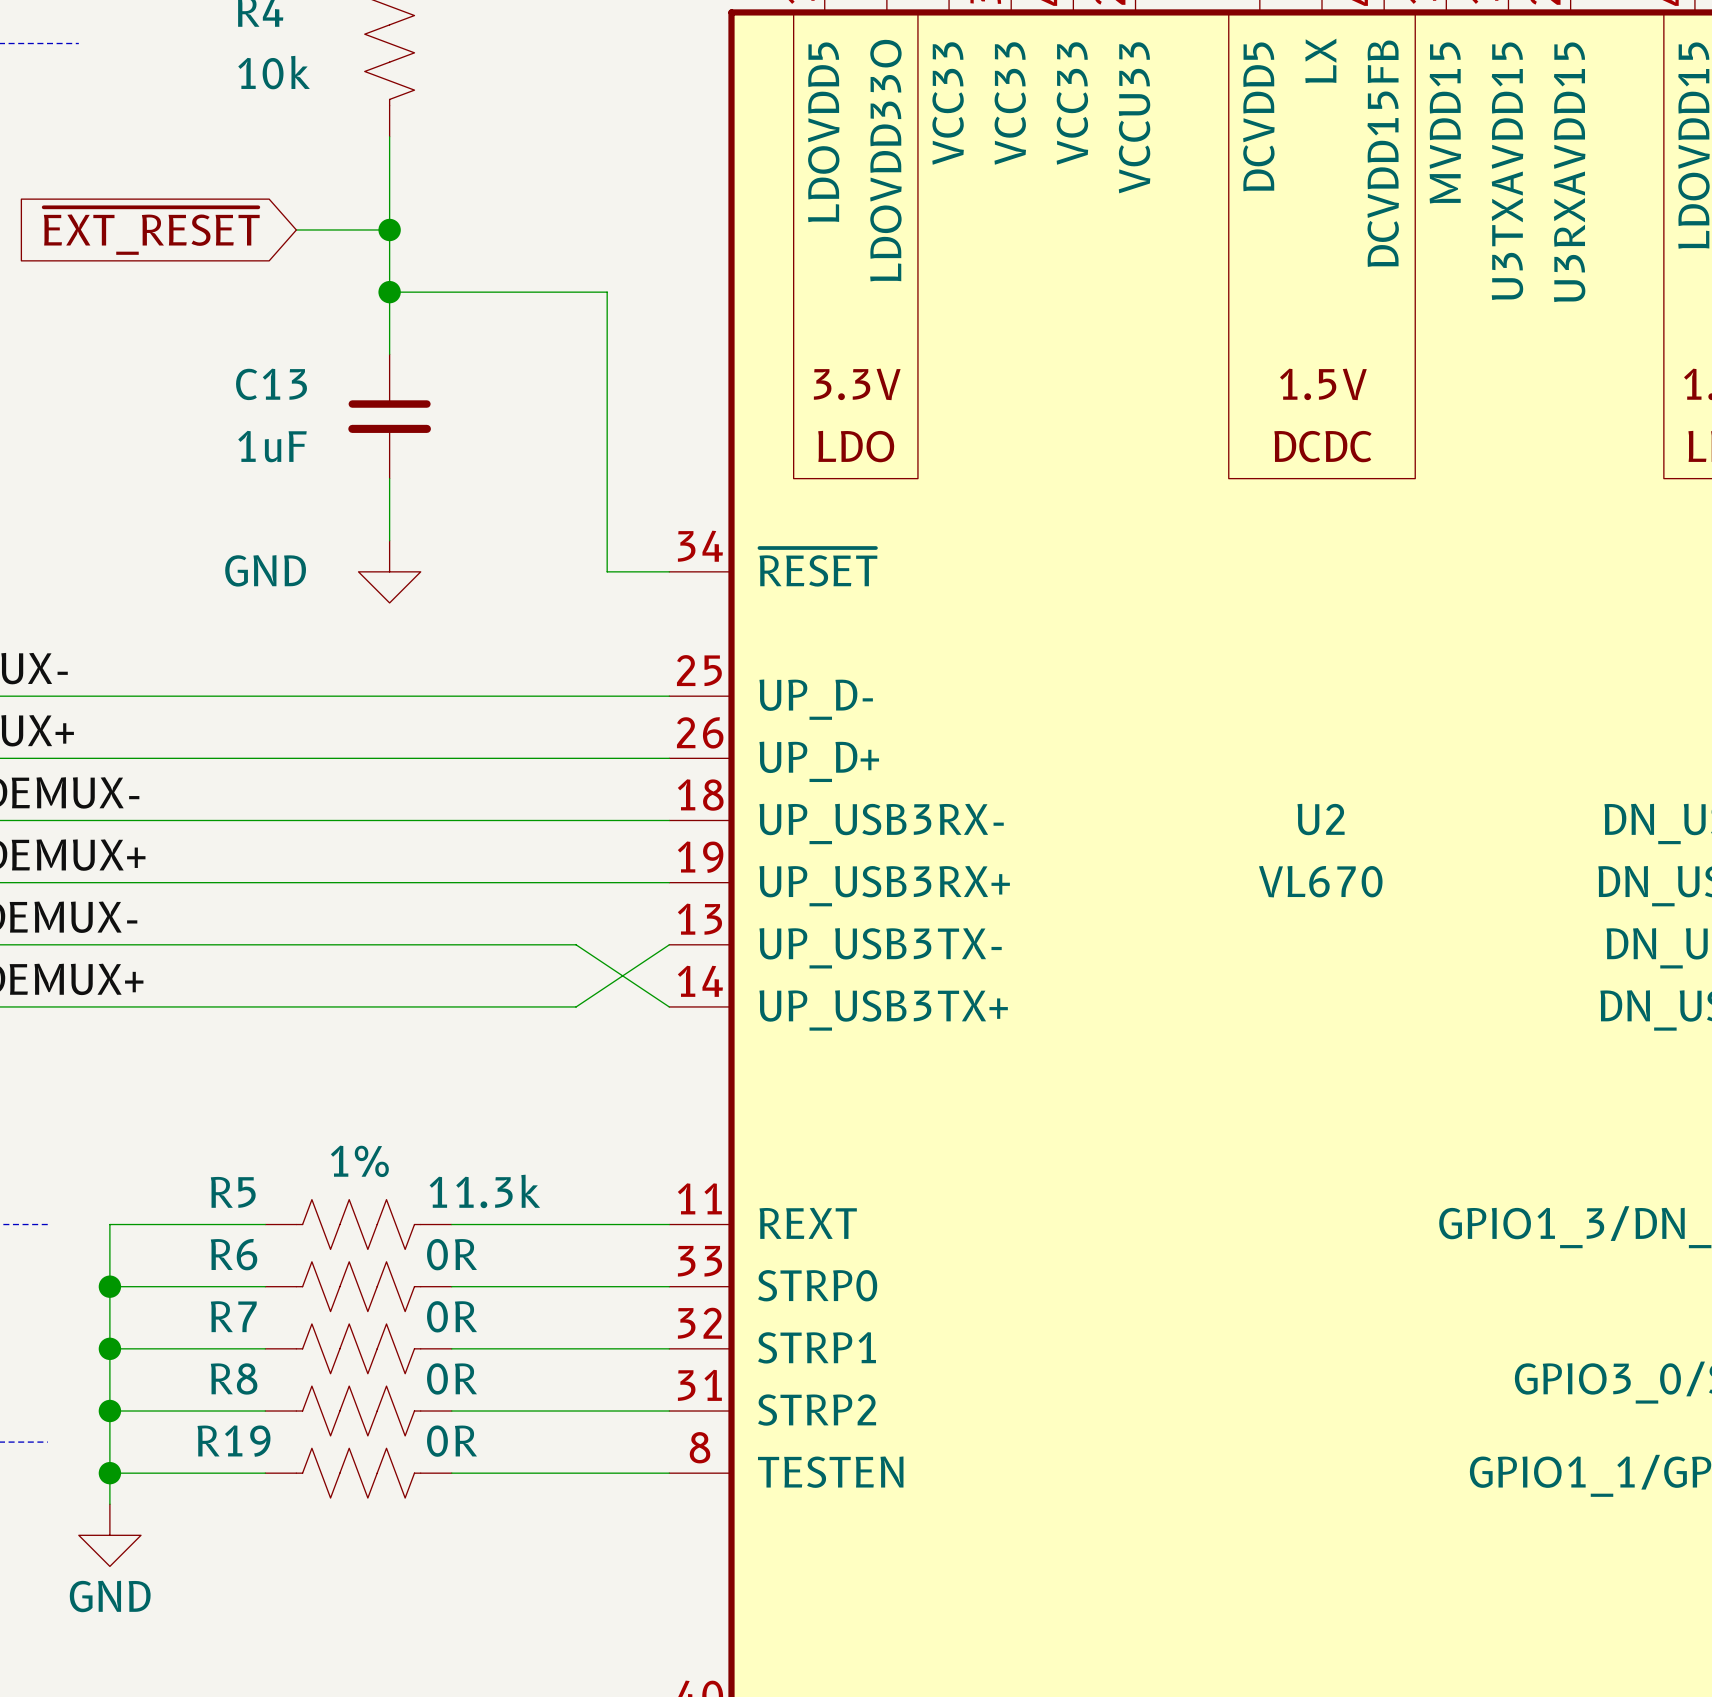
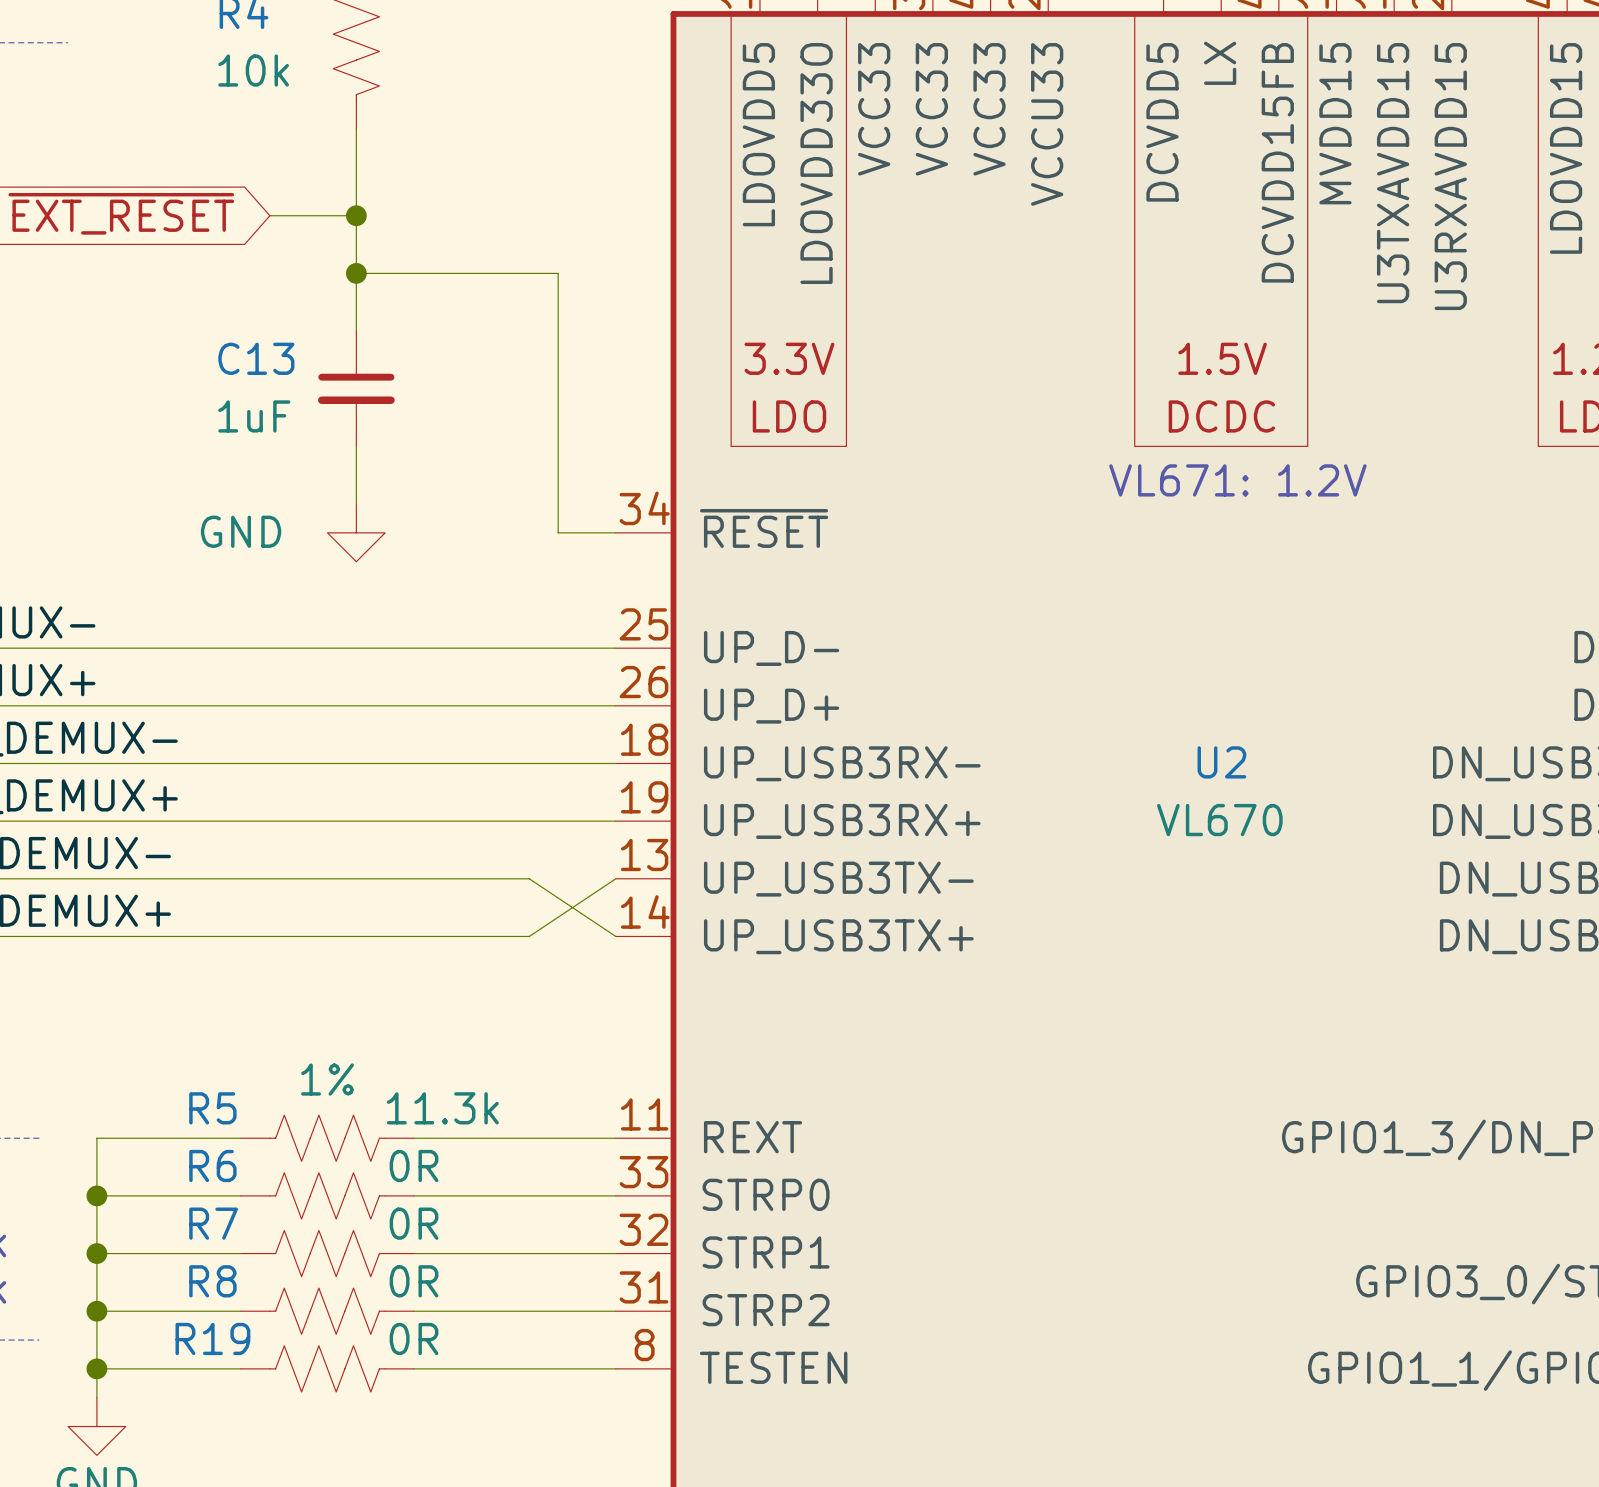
text: none -> VL671: 1.2V (1237, 480)

